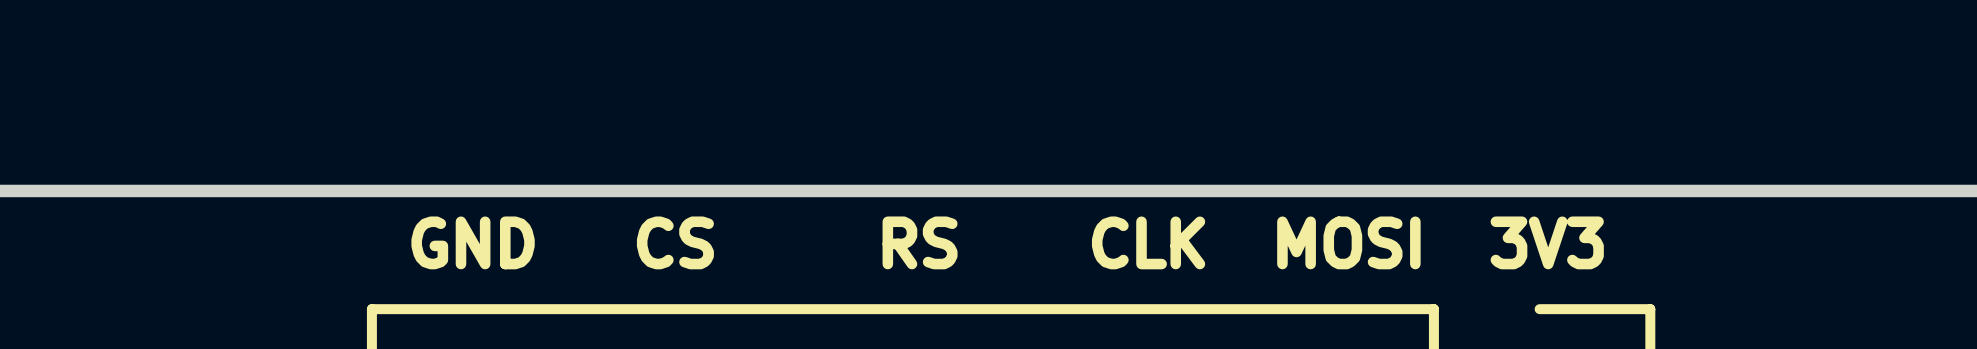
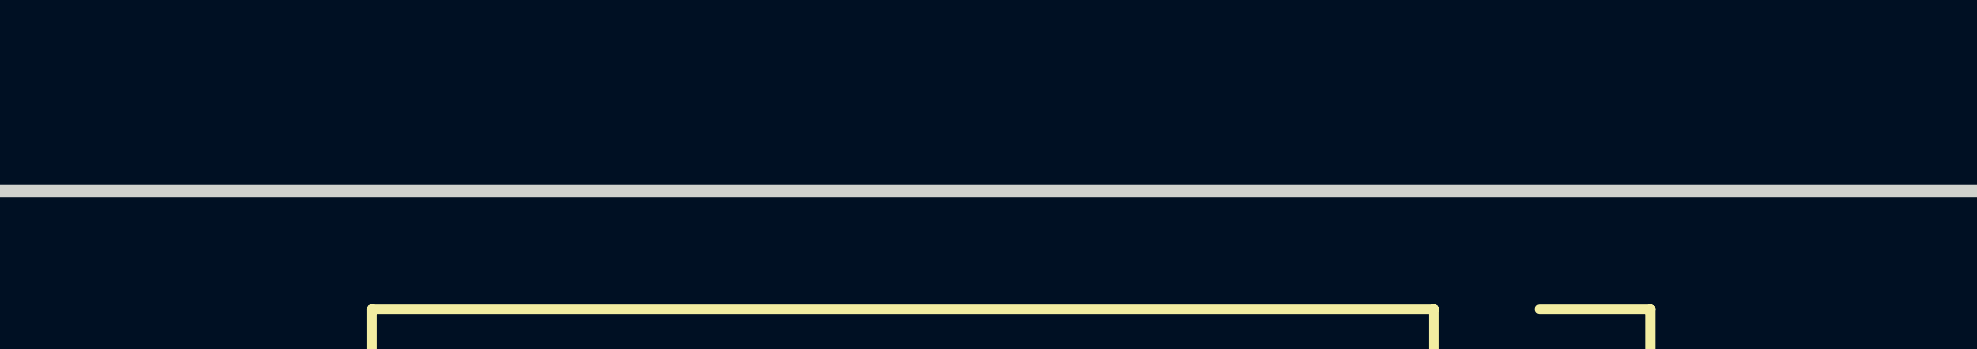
text: GND CS RS CLK MOSI 3V3 (1007, 242) -> none

